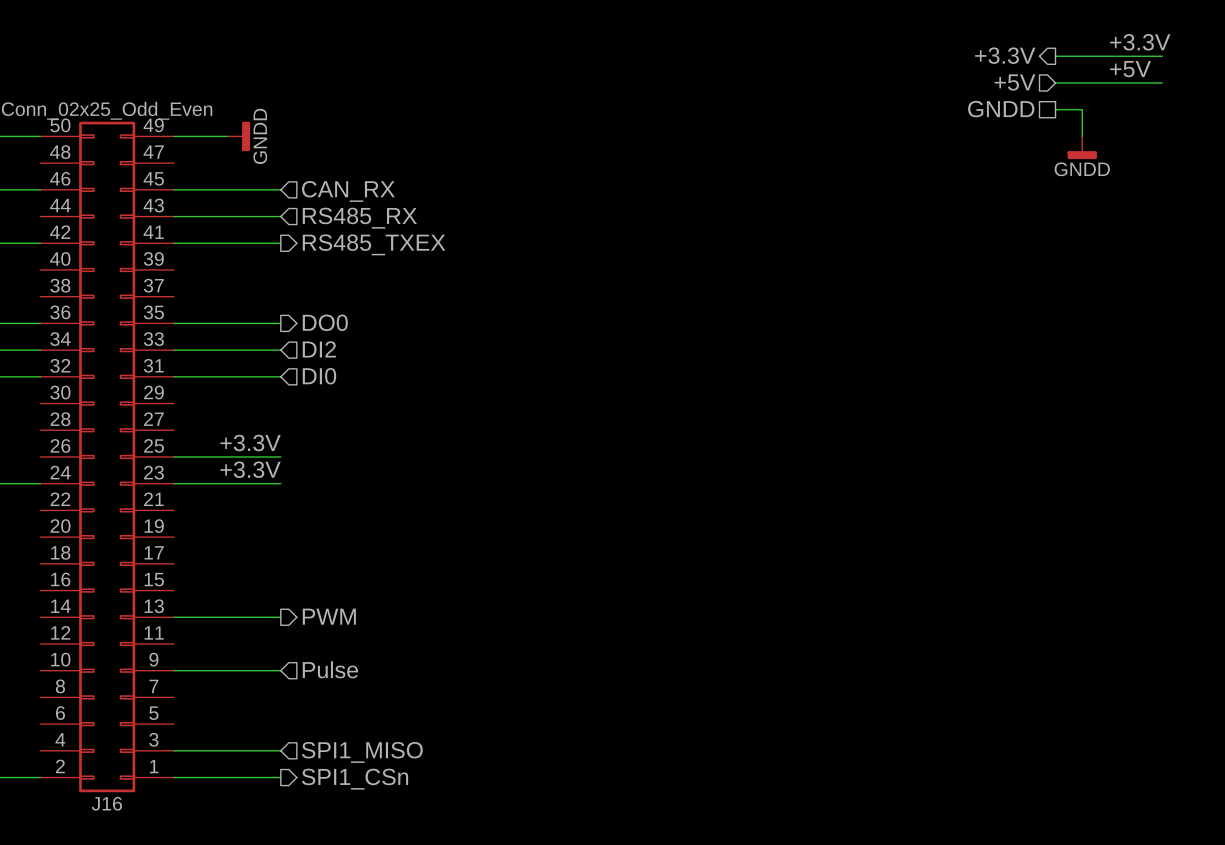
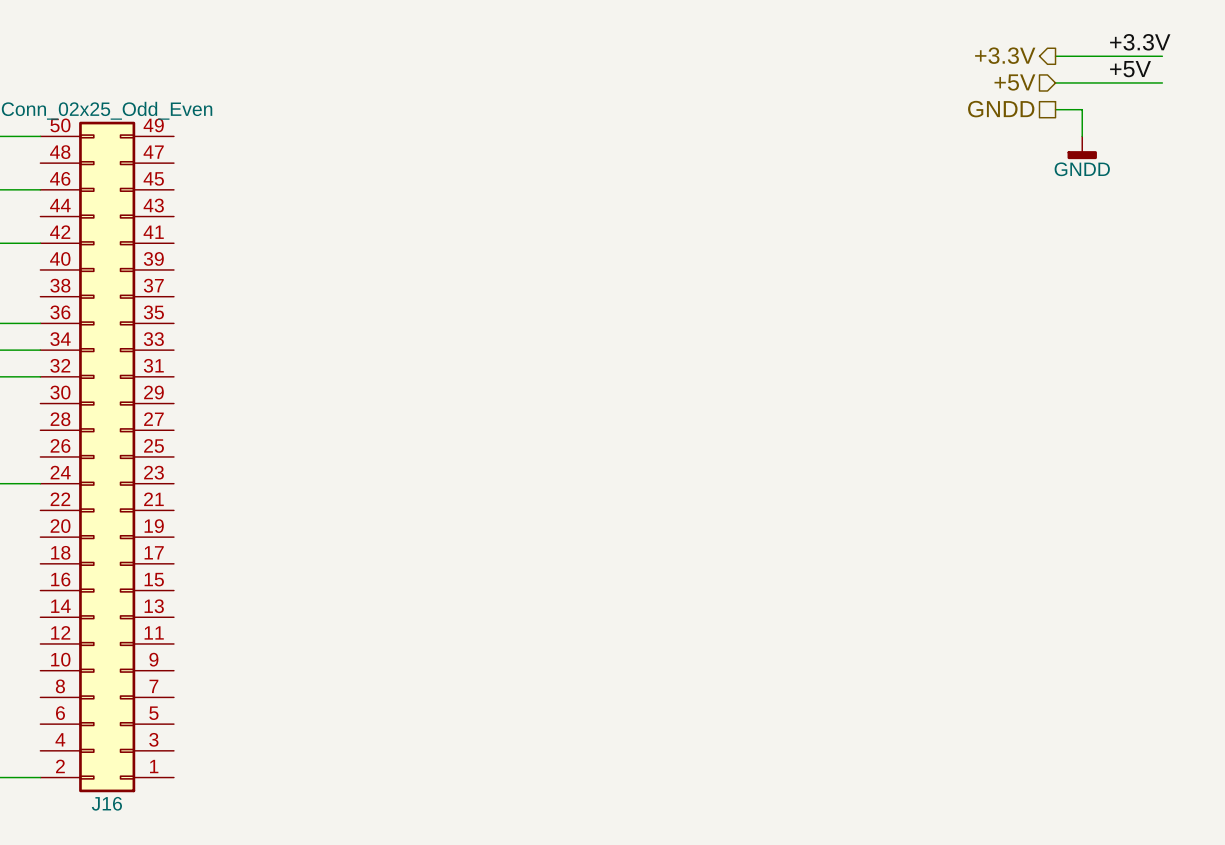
wire: (173, 136) (227, 136) -> none
power symbol: GNDD (238, 136) -> none
wire: (173, 189) (280, 189) -> none
hierarchical label: CAN_RX (348, 191) -> none
wire: (173, 216) (280, 216) -> none
hierarchical label: RS485_RX (359, 218) -> none
wire: (173, 243) (280, 243) -> none
hierarchical label: RS485_TXEX (374, 244) -> none
hierarchical label: DO0 (325, 322) -> none
wire: (173, 323) (280, 323) -> none
hierarchical label: DI2 (319, 349) -> none
wire: (173, 350) (280, 350) -> none
wire: (173, 376) (280, 376) -> none
hierarchical label: DI0 (319, 376) -> none
label: +3.3V (250, 442) -> none
wire: (173, 456) (280, 456) -> none
label: +3.3V (250, 469) -> none
wire: (173, 483) (280, 483) -> none
hierarchical label: PWM (329, 616) -> none
wire: (173, 617) (280, 617) -> none
hierarchical label: Pulse (330, 669) -> none
wire: (173, 670) (280, 670) -> none
wire: (173, 750) (280, 750) -> none
hierarchical label: SPI1_MISO (362, 752) -> none
wire: (173, 777) (280, 777) -> none
hierarchical label: SPI1_CSn (355, 779) -> none

